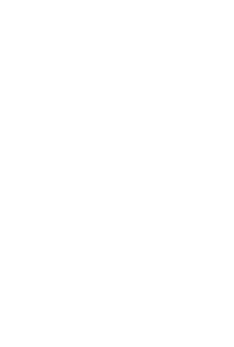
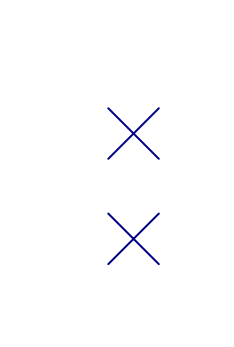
no-connect mark: none -> (133, 133)
no-connect mark: none -> (133, 238)

